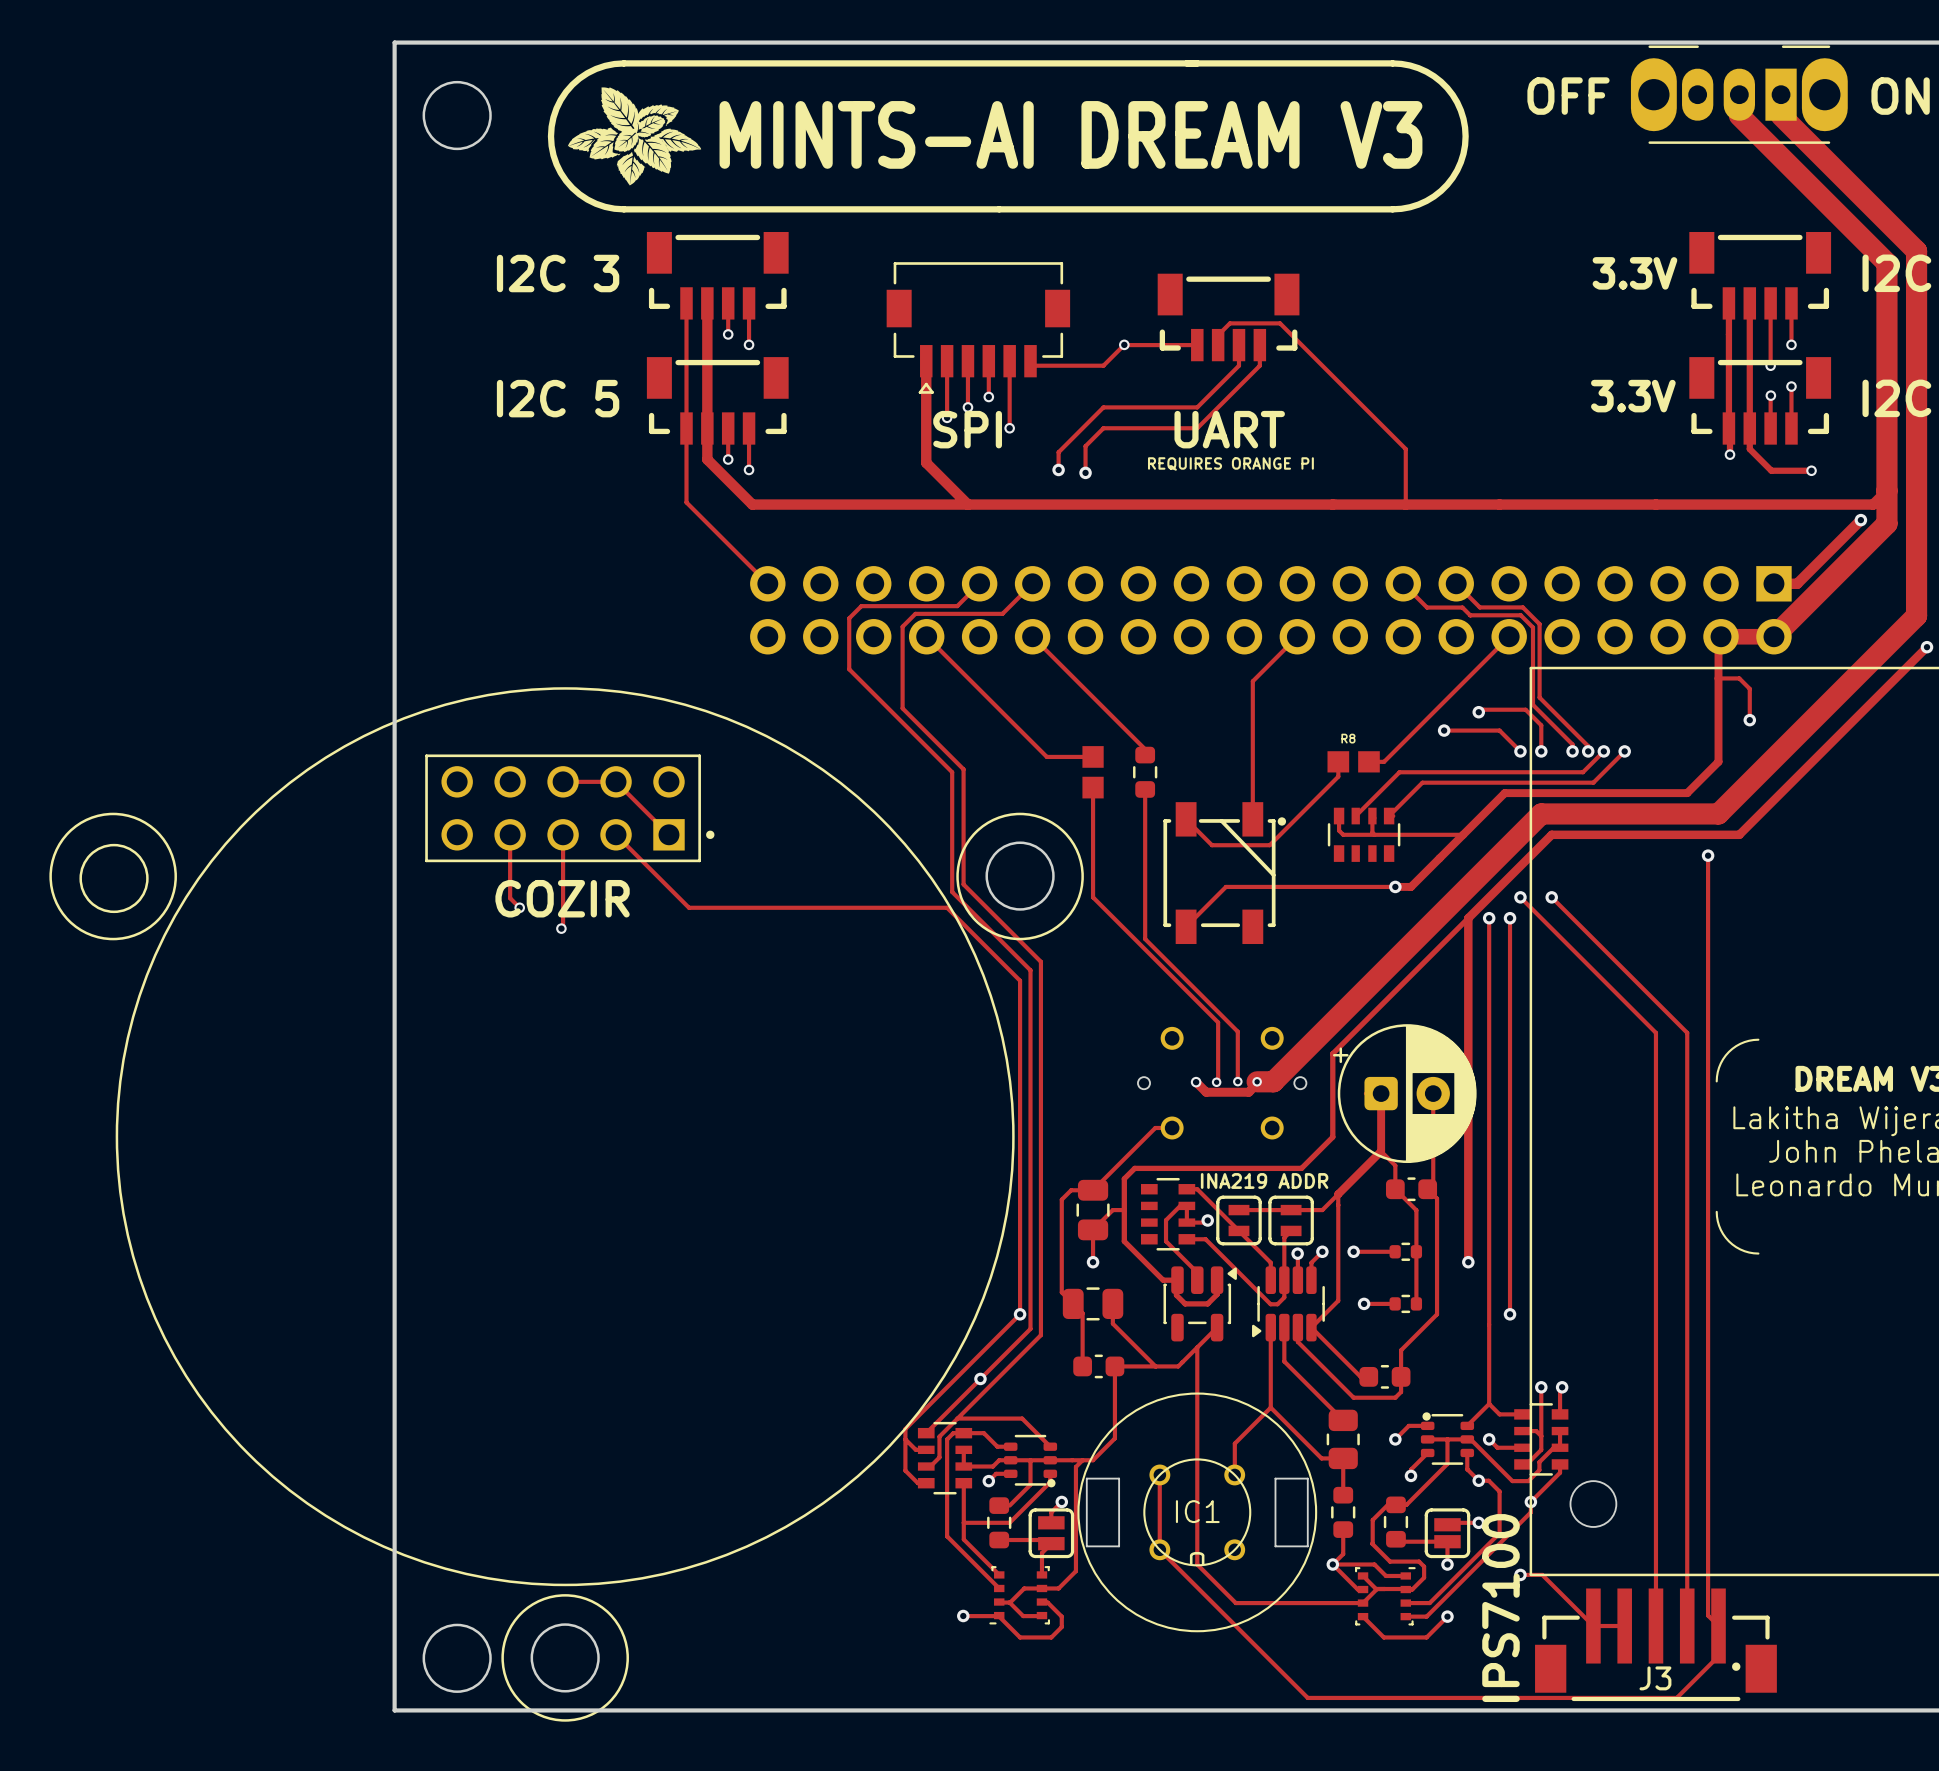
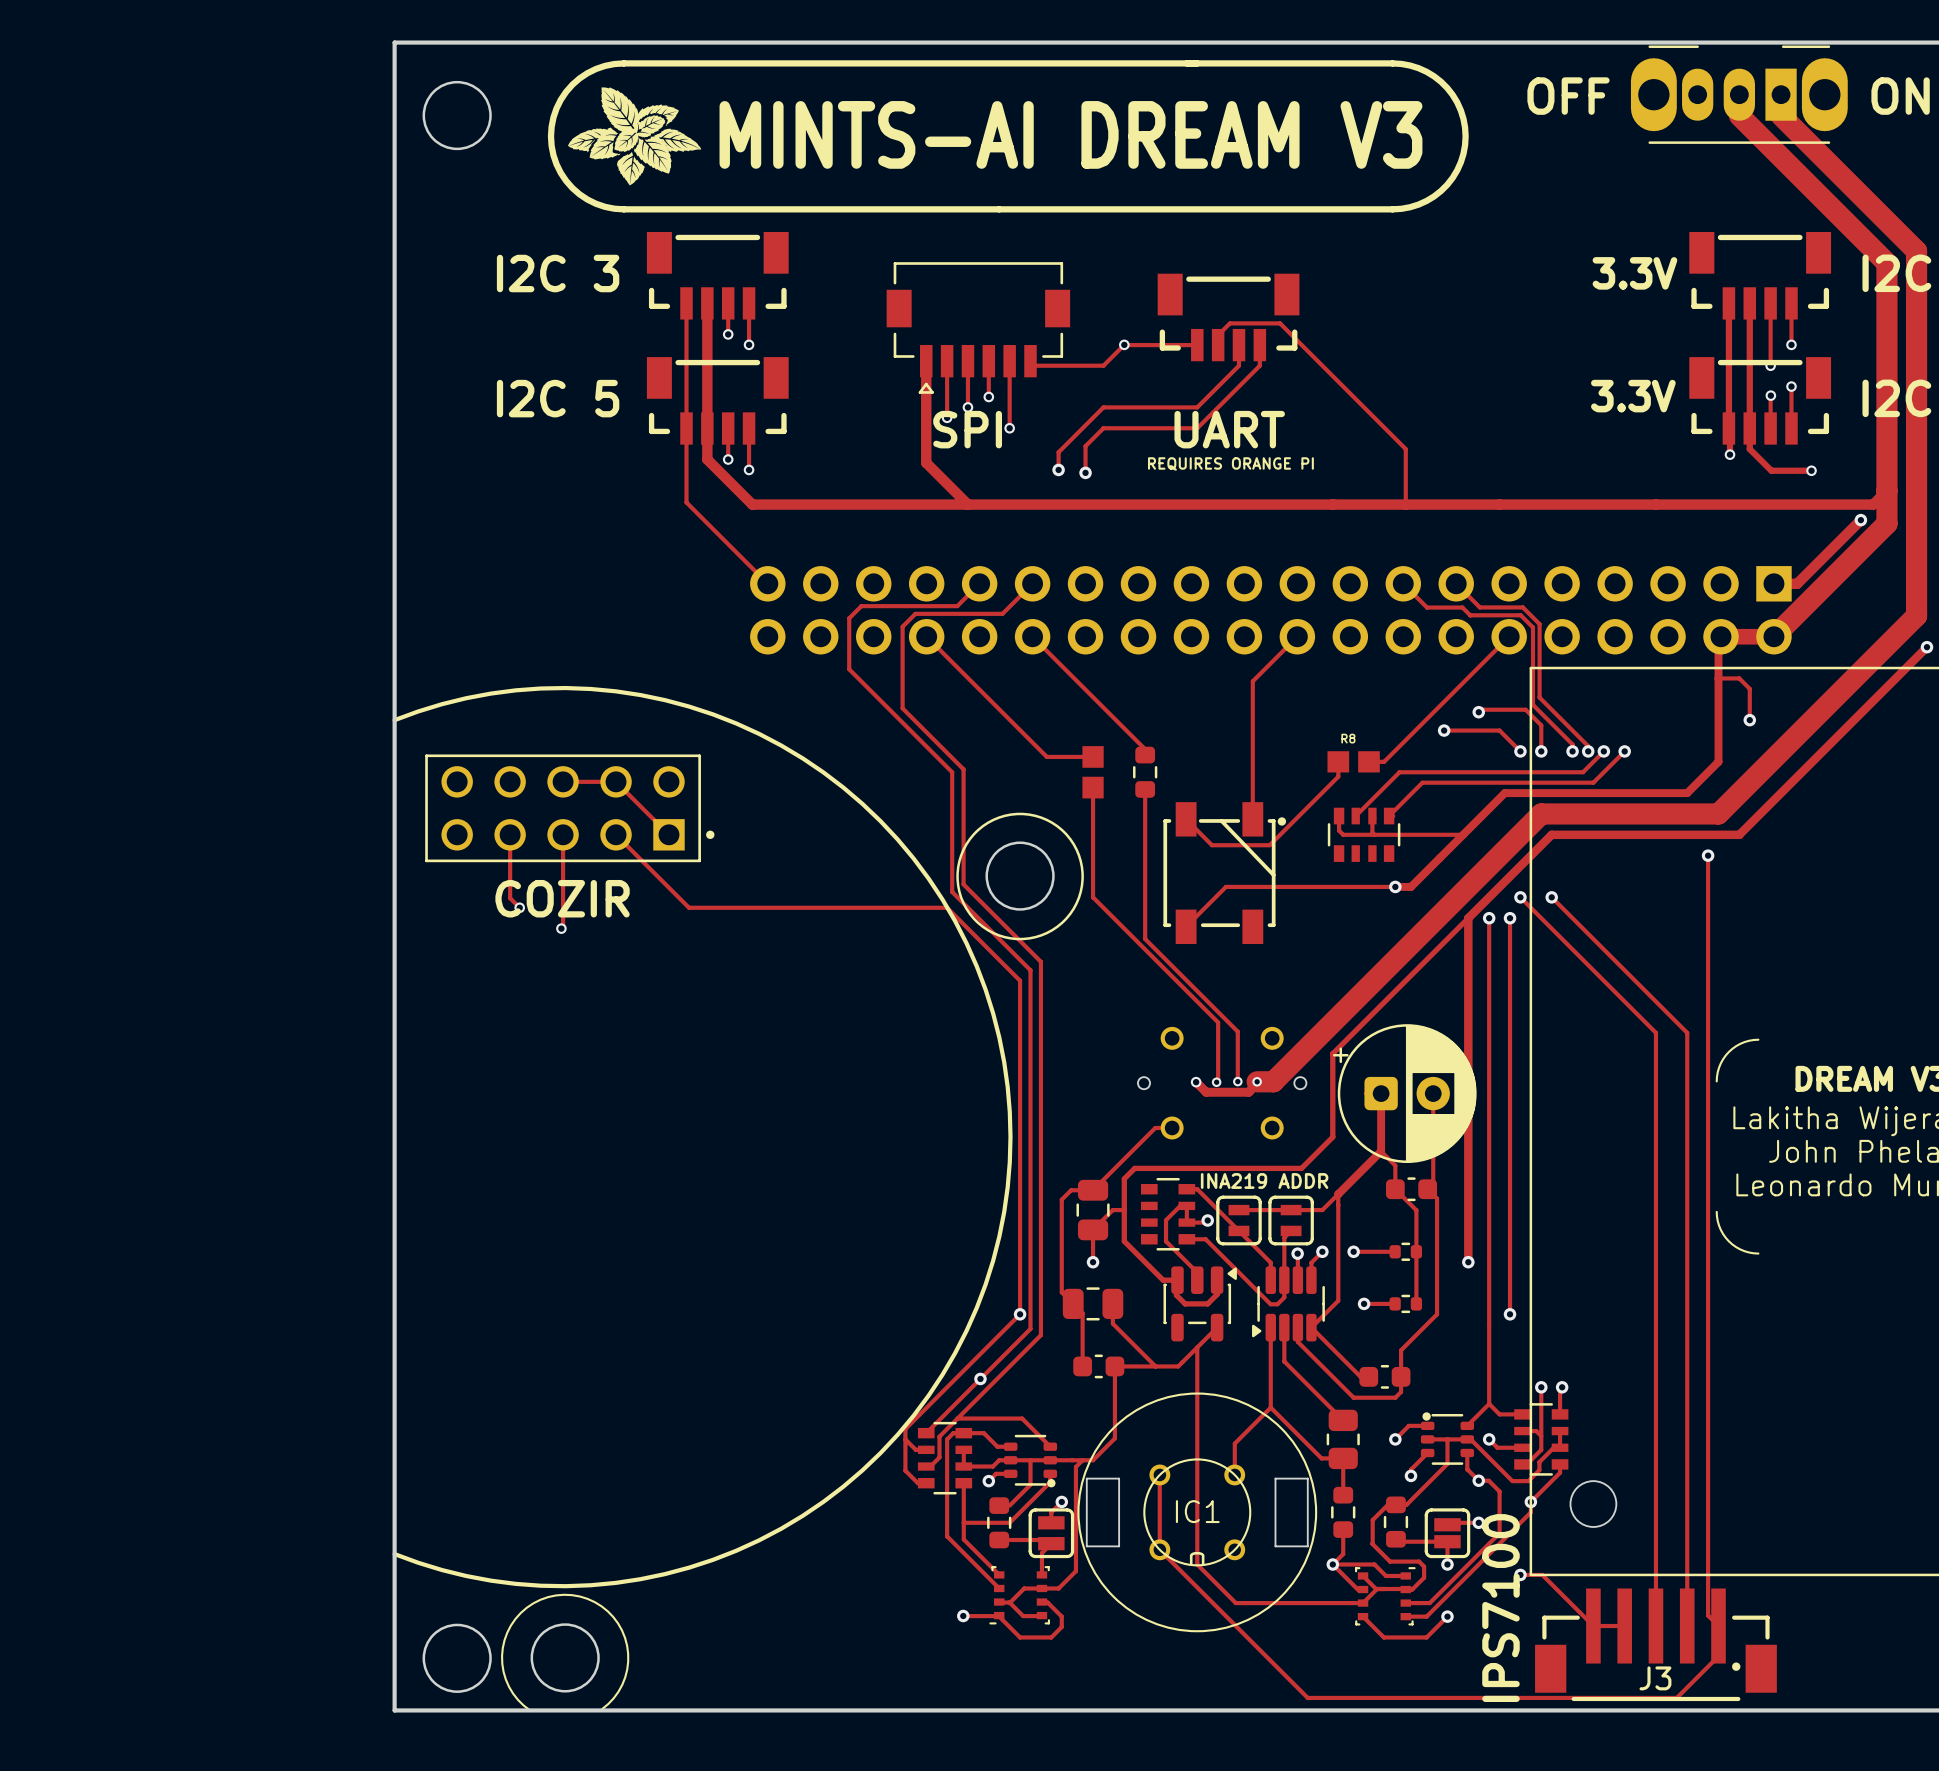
drawing: [49, 687, 1015, 1722] -> none
line: none -> (394, 720) (442, 704) (490, 693) (540, 688) (590, 688) (665, 700) (712, 714) (759, 733) (802, 758) (862, 803) (897, 839) (928, 878) (955, 921) (976, 966) (993, 1013) (1007, 1087) (1010, 1137) (1004, 1211) (993, 1260) (976, 1307) (955, 1353) (928, 1395) (897, 1434) (862, 1470) (823, 1501) (781, 1528) (736, 1550) (689, 1567) (615, 1582) (565, 1586) (490, 1580) (442, 1570) (394, 1554)
line: none -> (602, 1709) (618, 1691) (625, 1677) (628, 1661) (625, 1637) (618, 1623) (601, 1606) (579, 1596) (563, 1594) (548, 1597) (526, 1607) (515, 1618) (504, 1640) (502, 1663) (505, 1679) (518, 1699) (530, 1710)

